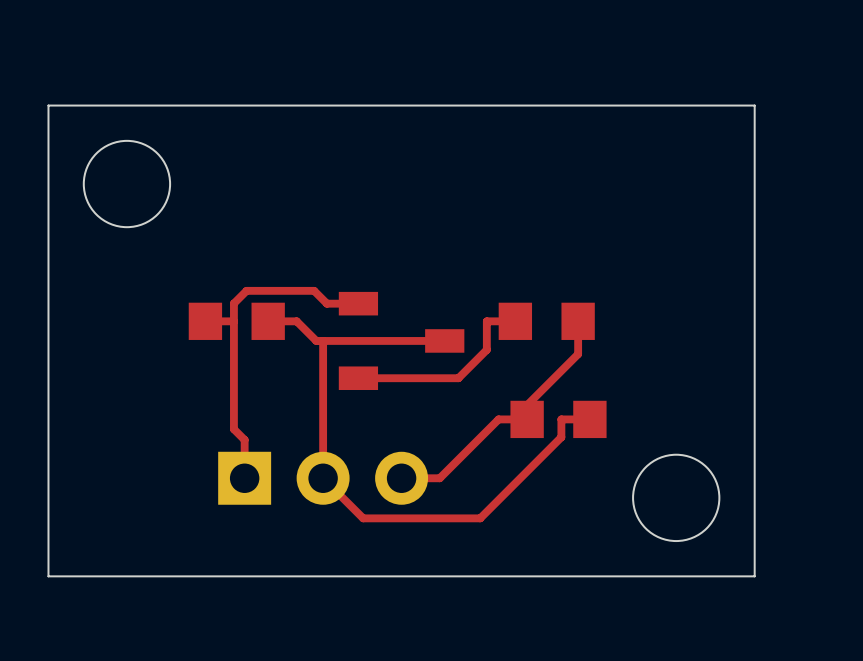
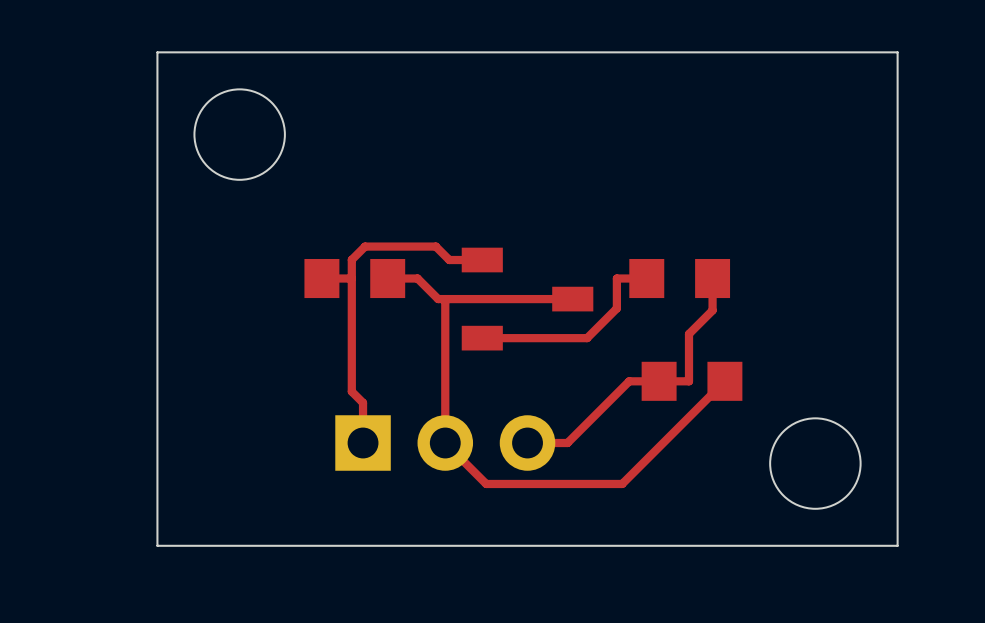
track: (578, 351) (578, 354) (512, 419) -> (712, 310) (689, 334) (689, 381) (659, 381)
track: (589, 419) (561, 419) (561, 437) (480, 518) (362, 517) -> (724, 381) (622, 483) (486, 483)

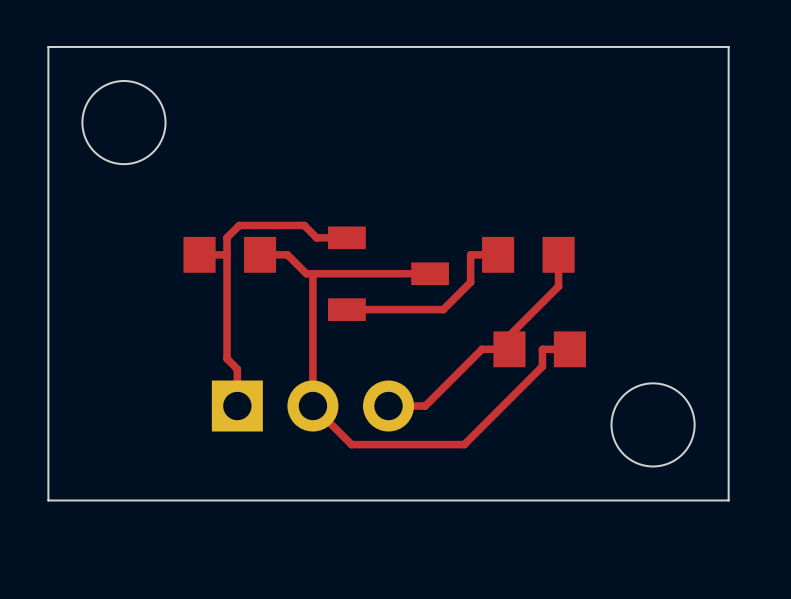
track: (712, 310) (689, 334) (689, 381) (659, 381) -> (558, 284) (558, 286) (495, 349)
track: (724, 381) (622, 483) (486, 483) -> (569, 349) (542, 349) (542, 366) (464, 444) (350, 443)

